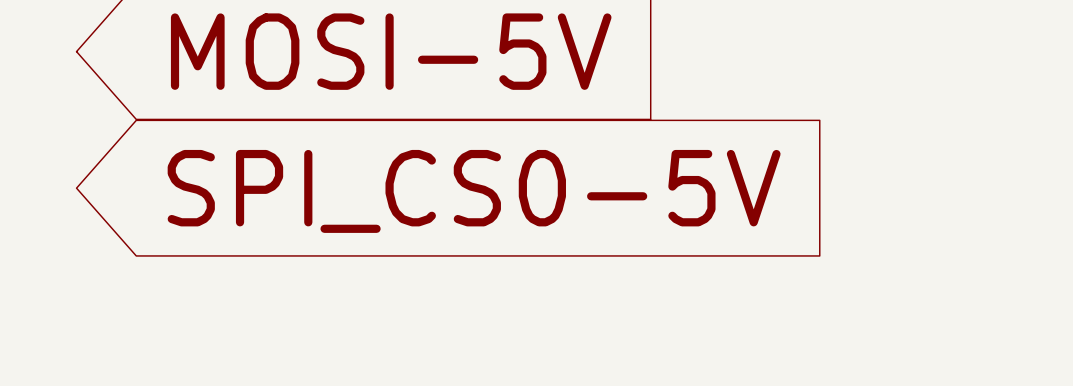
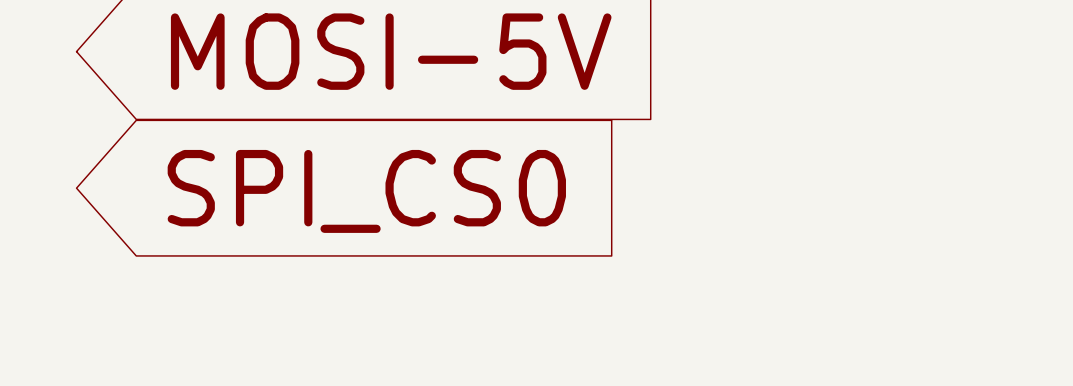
global label: SPI_CS0-5V (474, 191) -> SPI_CS0 (366, 191)

